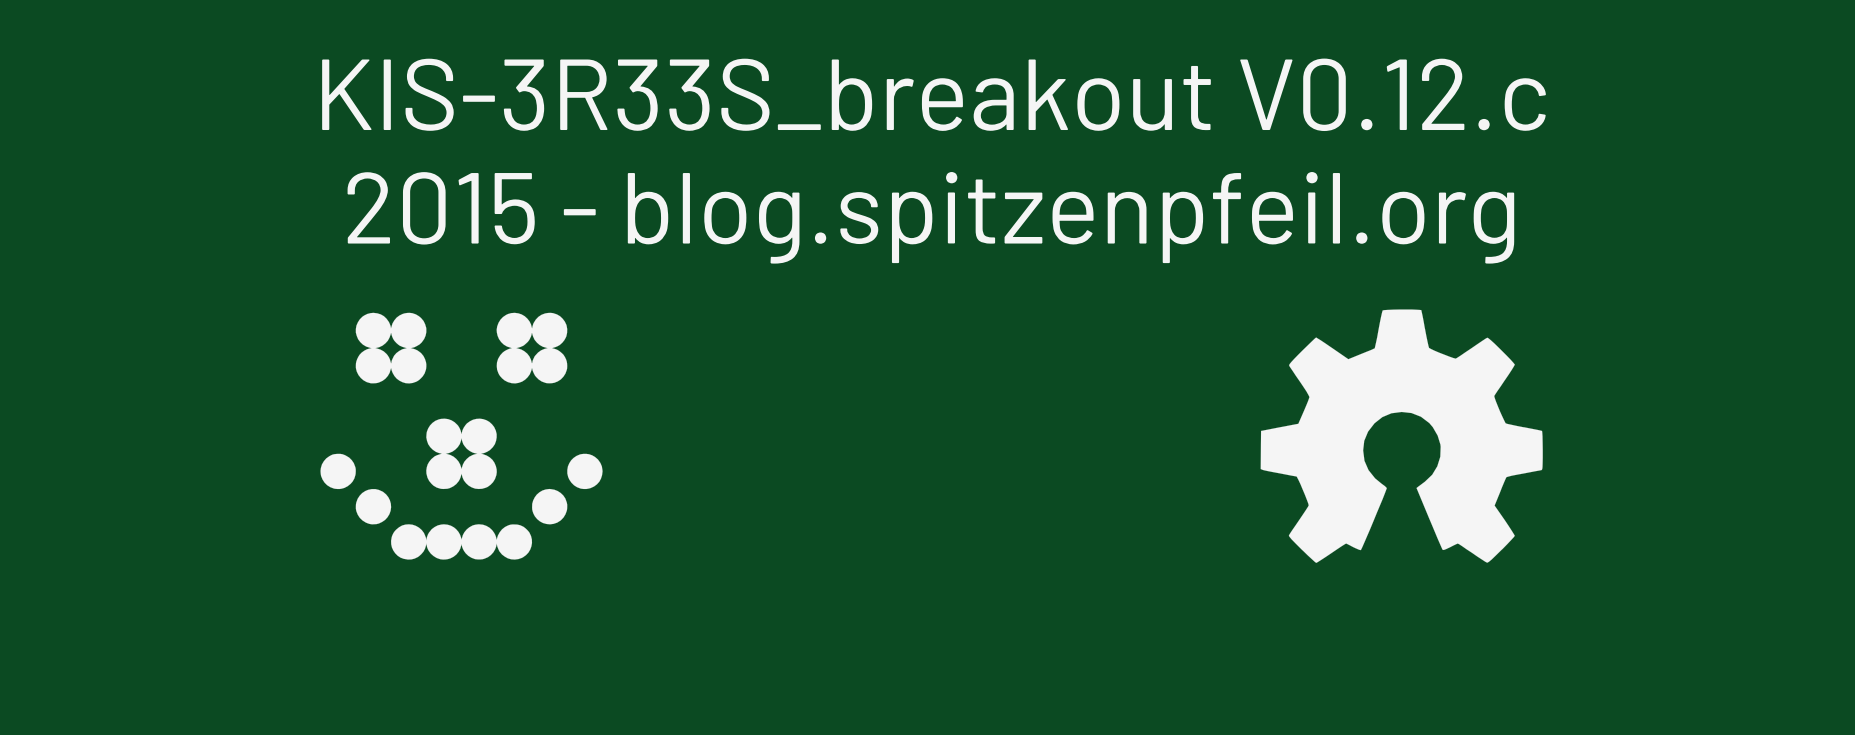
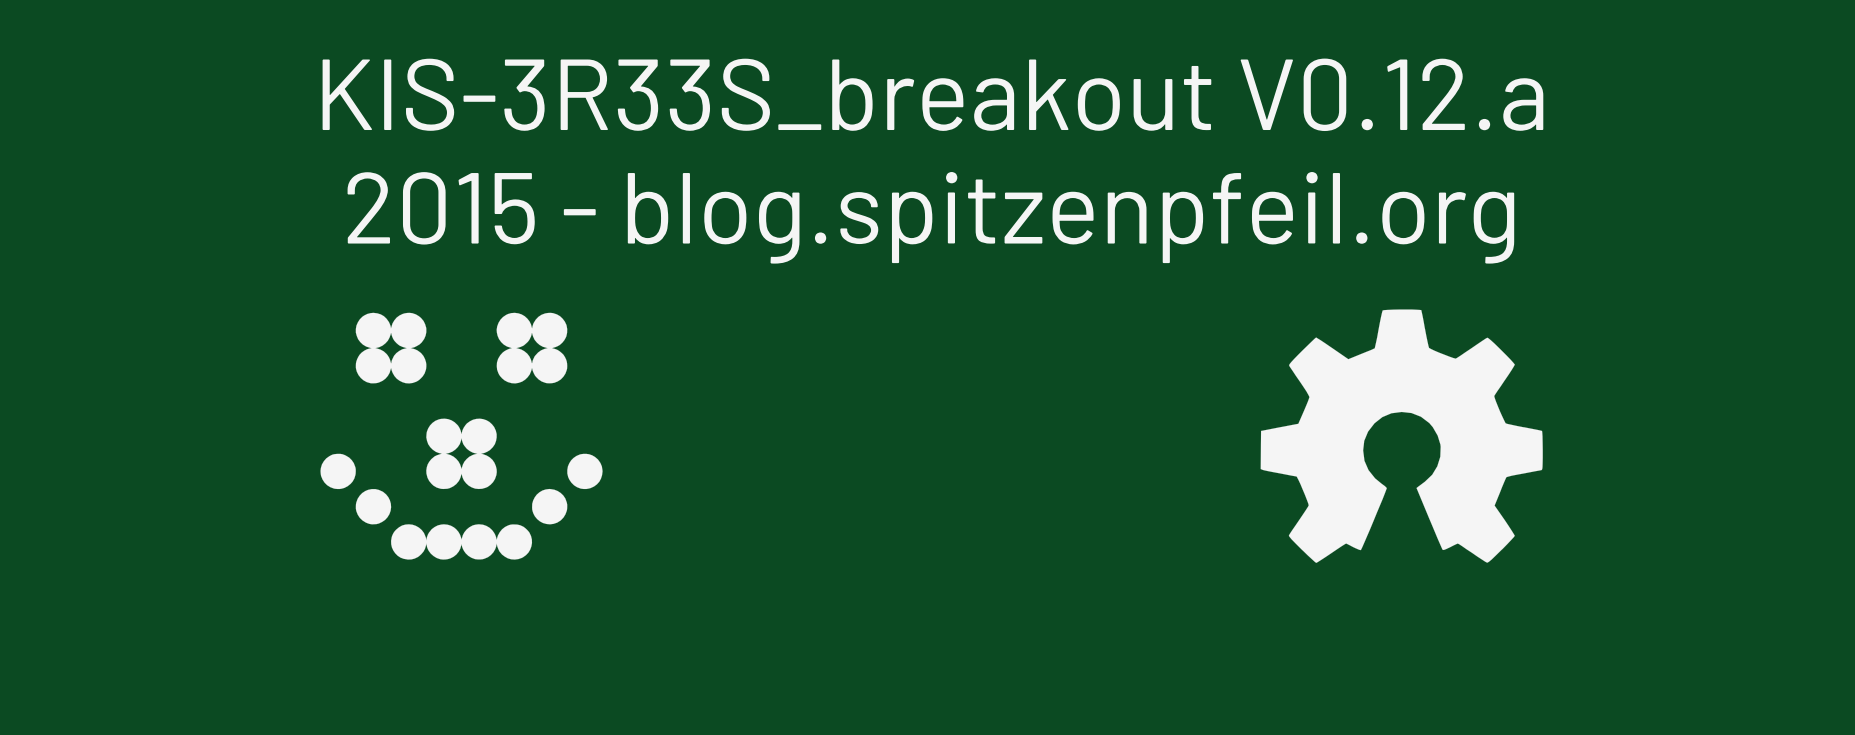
text: KIS-3R33S_breakout V0.12.c (934, 94) -> KIS-3R33S_breakout V0.12.a (932, 94)

